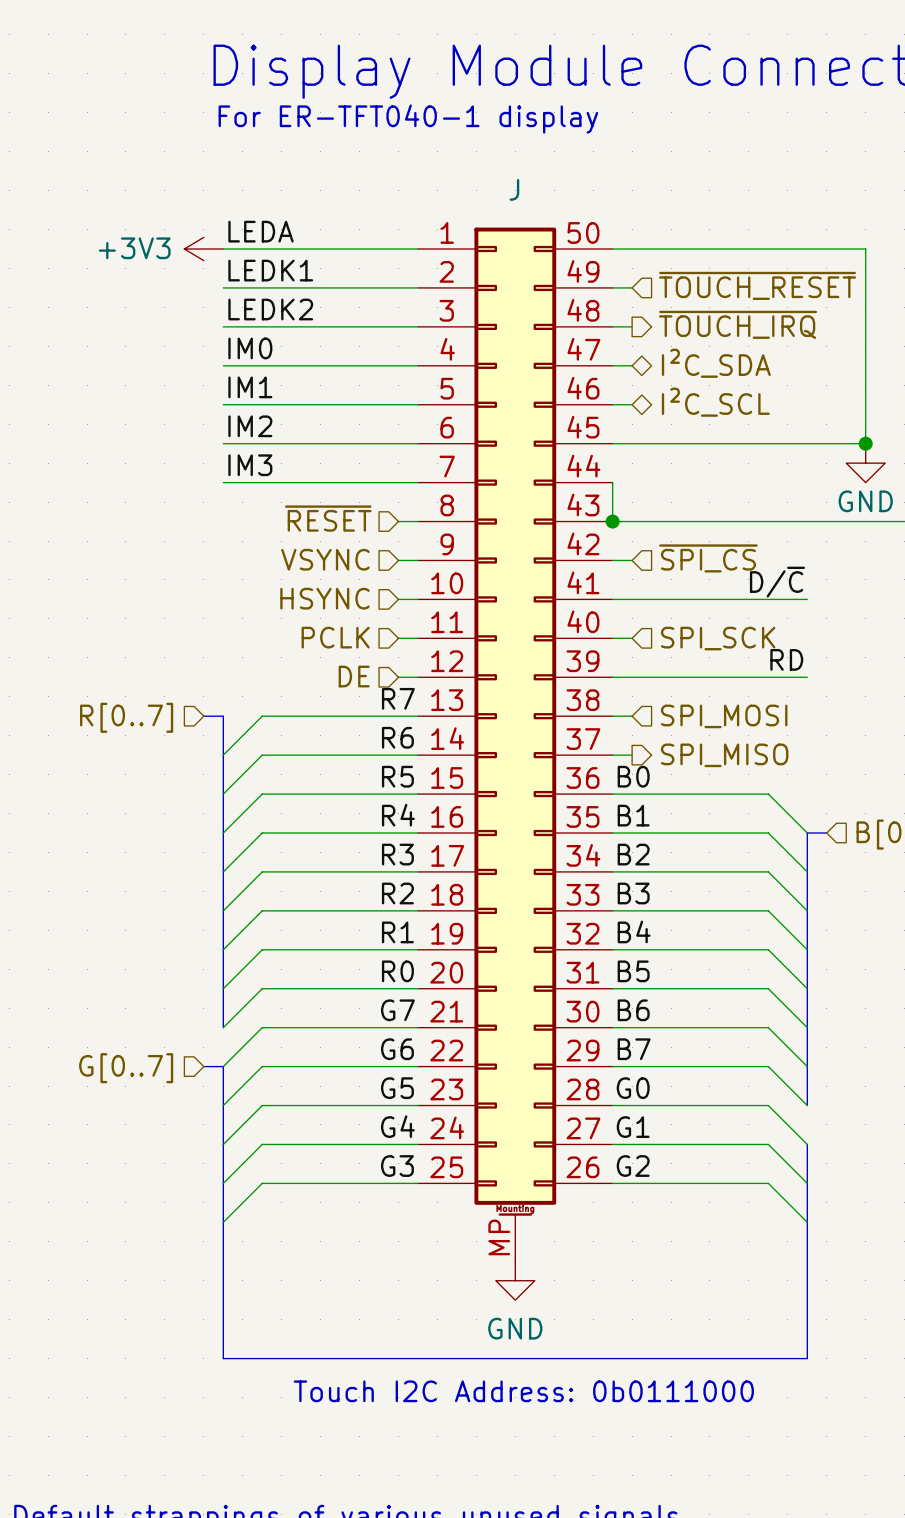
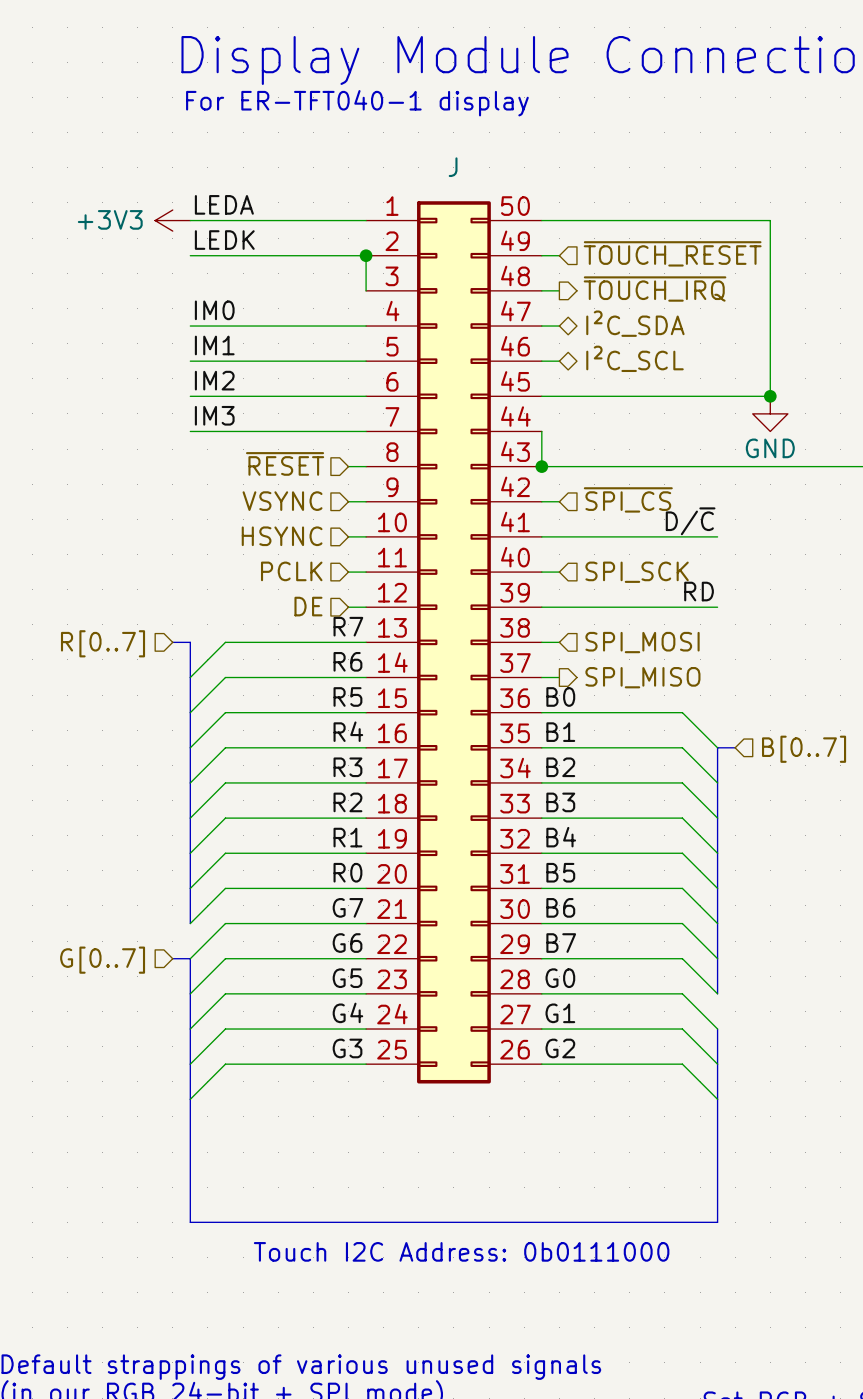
label: LEDK1 (270, 270) -> LEDK (224, 240)
junction: none -> (366, 255)
label: LEDK2 (270, 309) -> none
wire: (223, 326) (417, 326) -> (366, 255) (366, 290)
J: none -> (453, 642)
J: (515, 744) -> none
power symbol: GND (515, 1280) -> none

